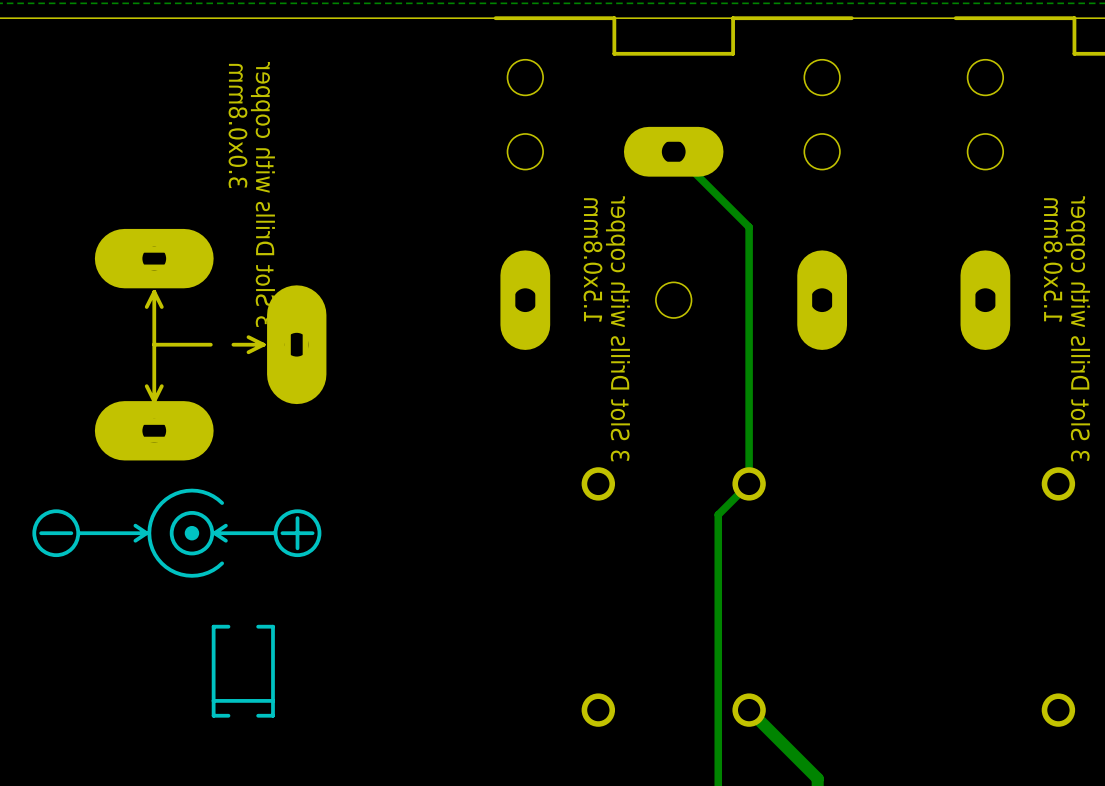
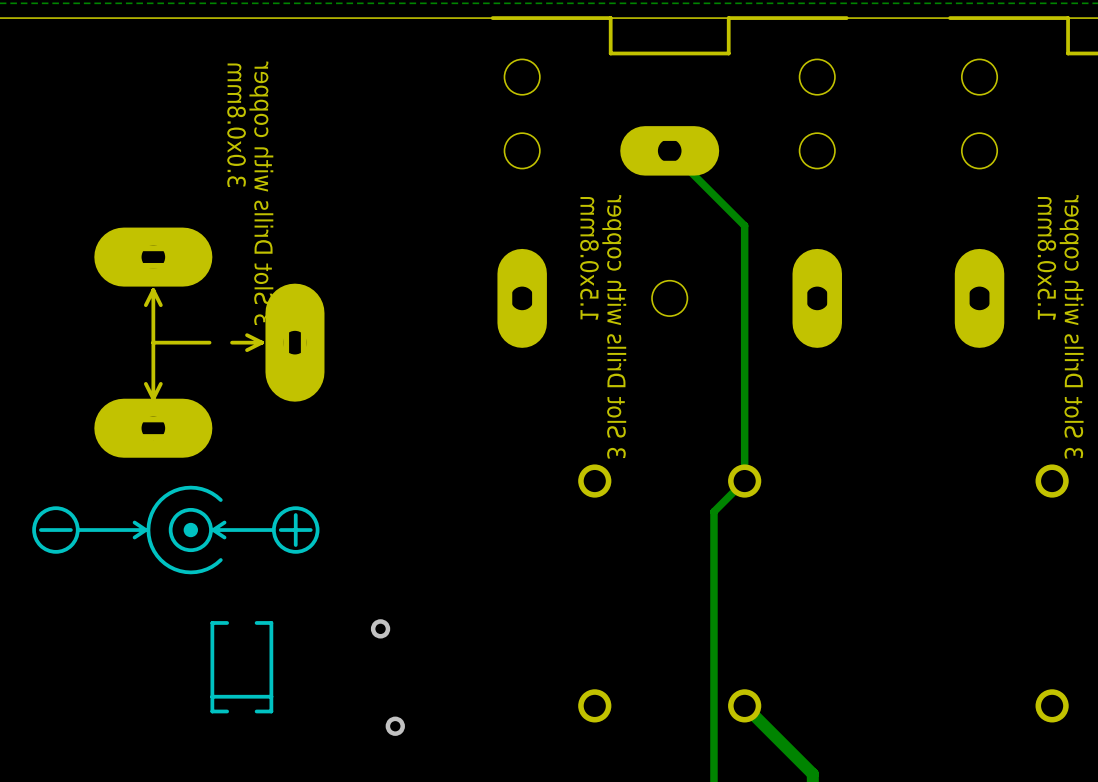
via: none -> (380, 628)
via: none -> (395, 726)

